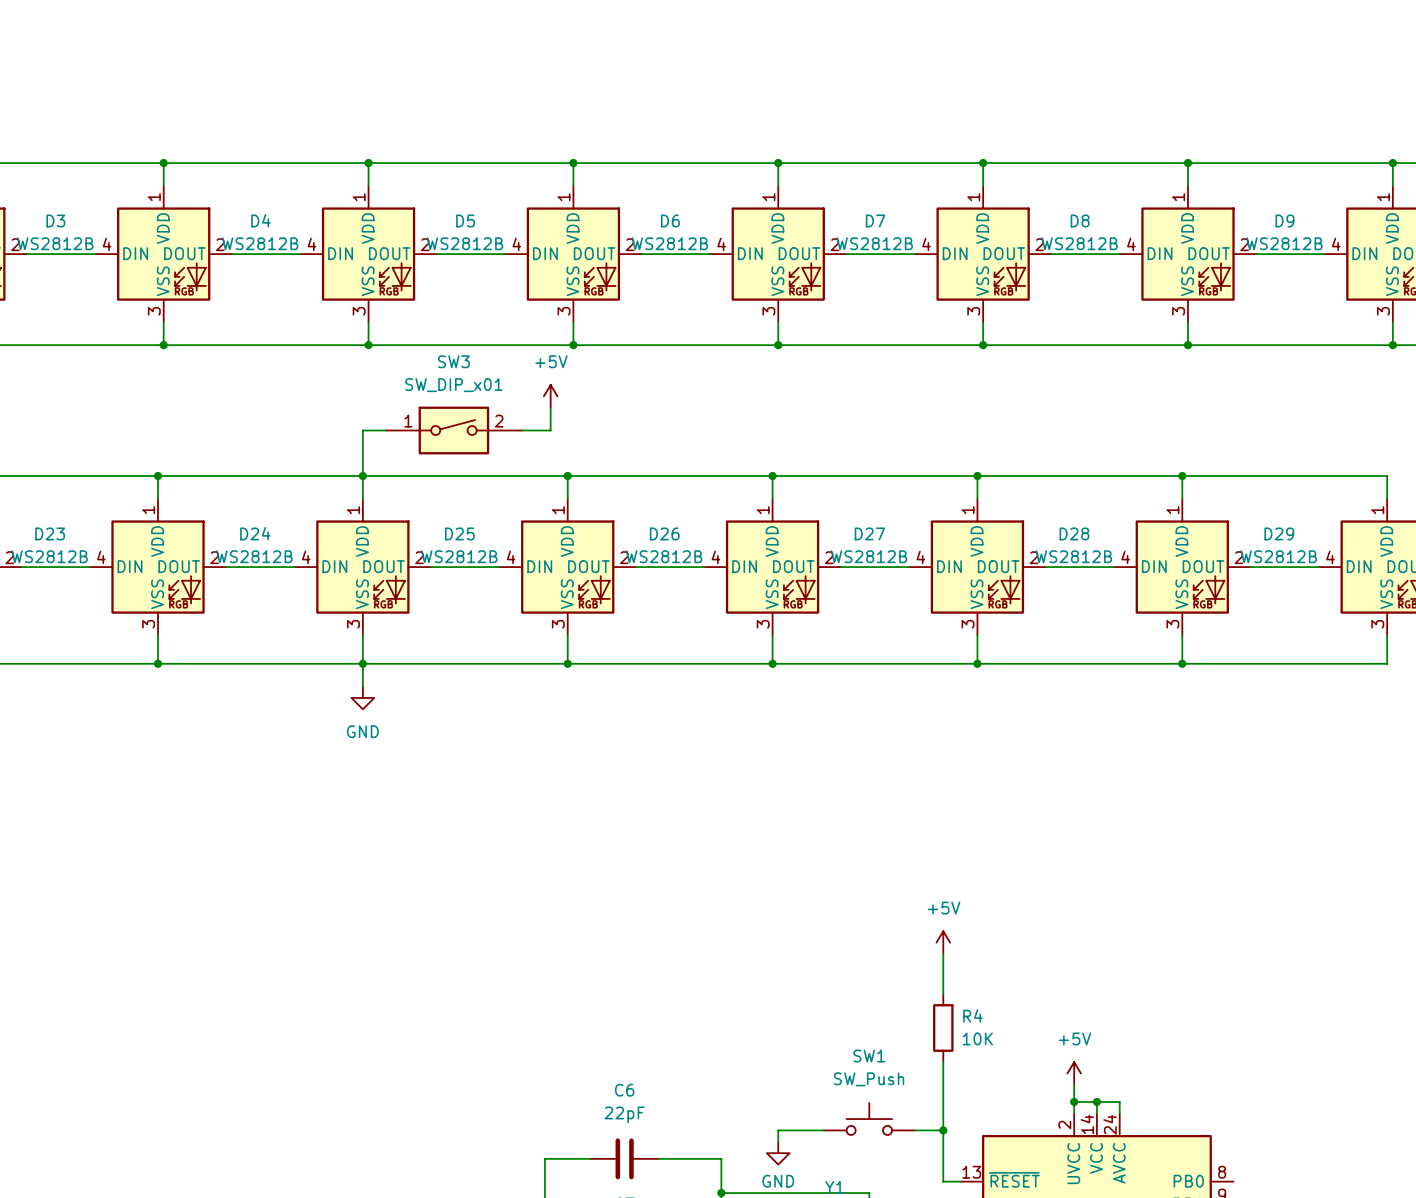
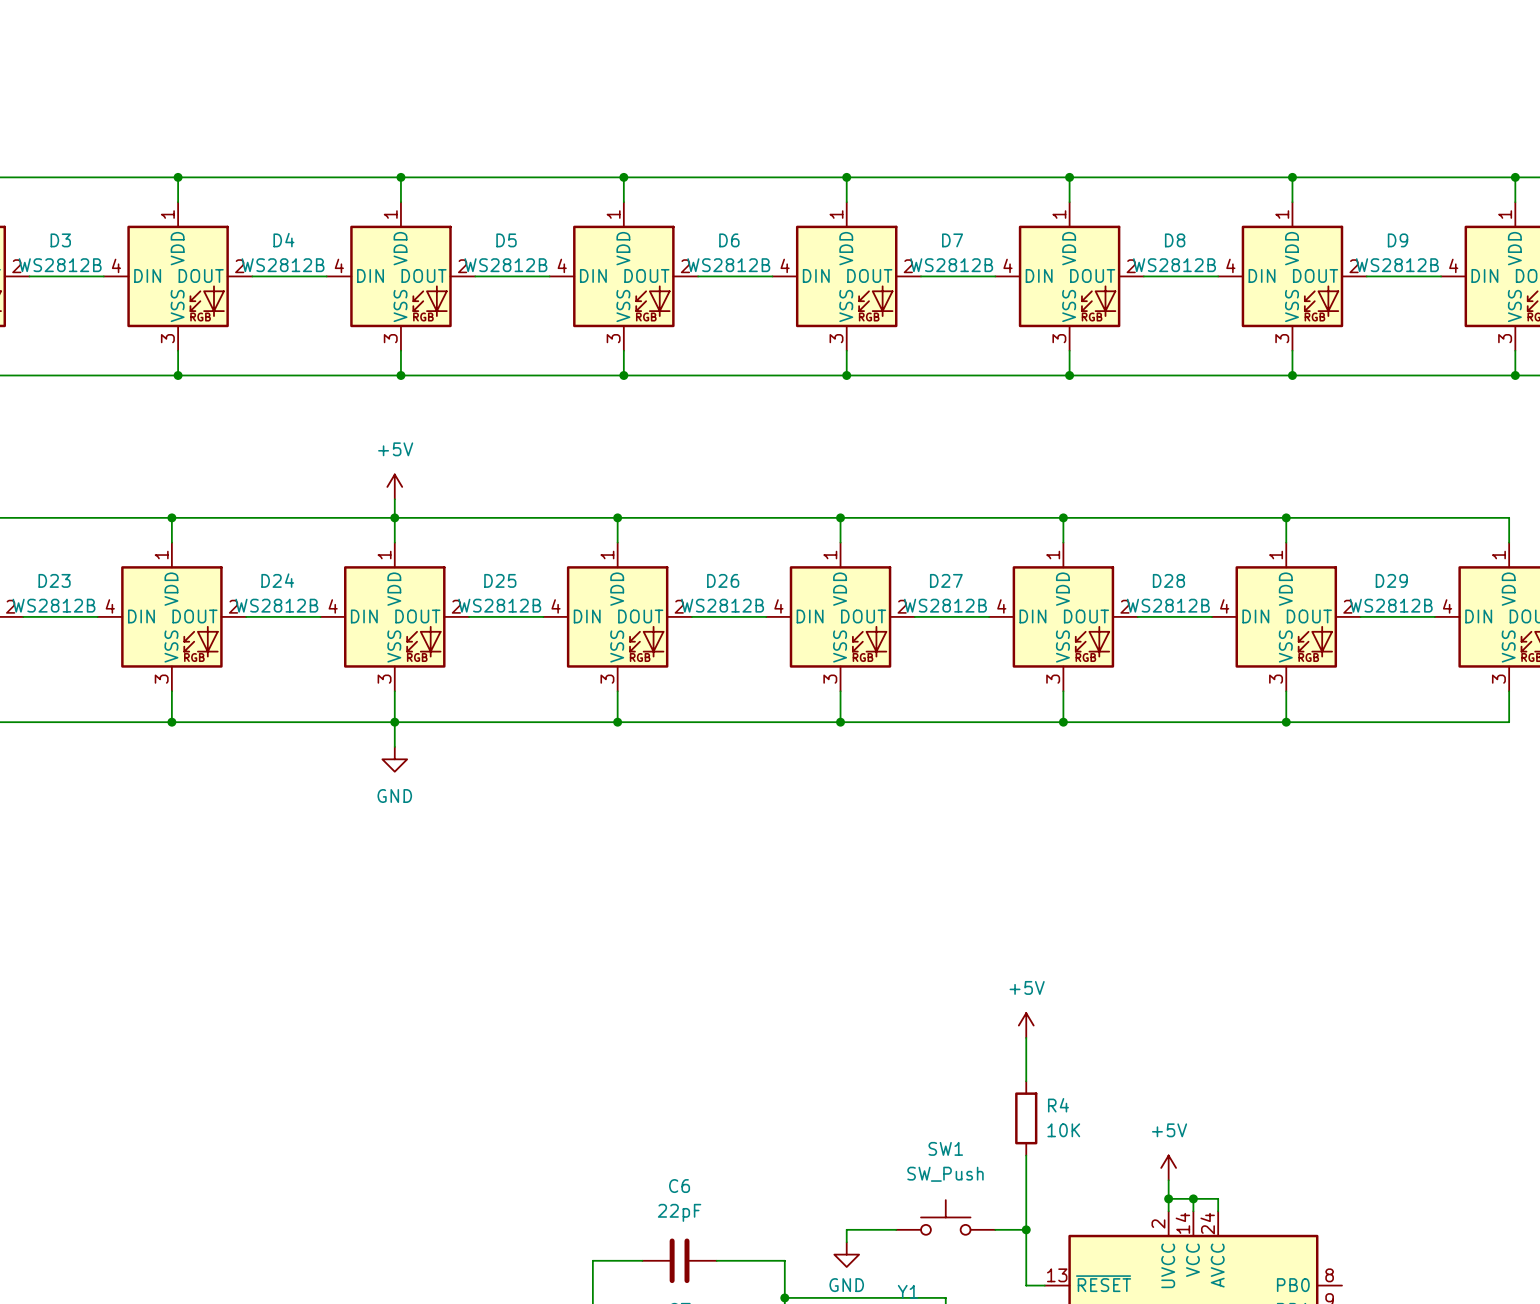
power symbol position: +5V (550, 396) -> +5V (394, 486)
wire: (550, 407) (550, 430) (522, 430) -> none
wire: (385, 430) (362, 430) (362, 458) -> none
SW3: SW_DIP_x01 (453, 430) -> none

